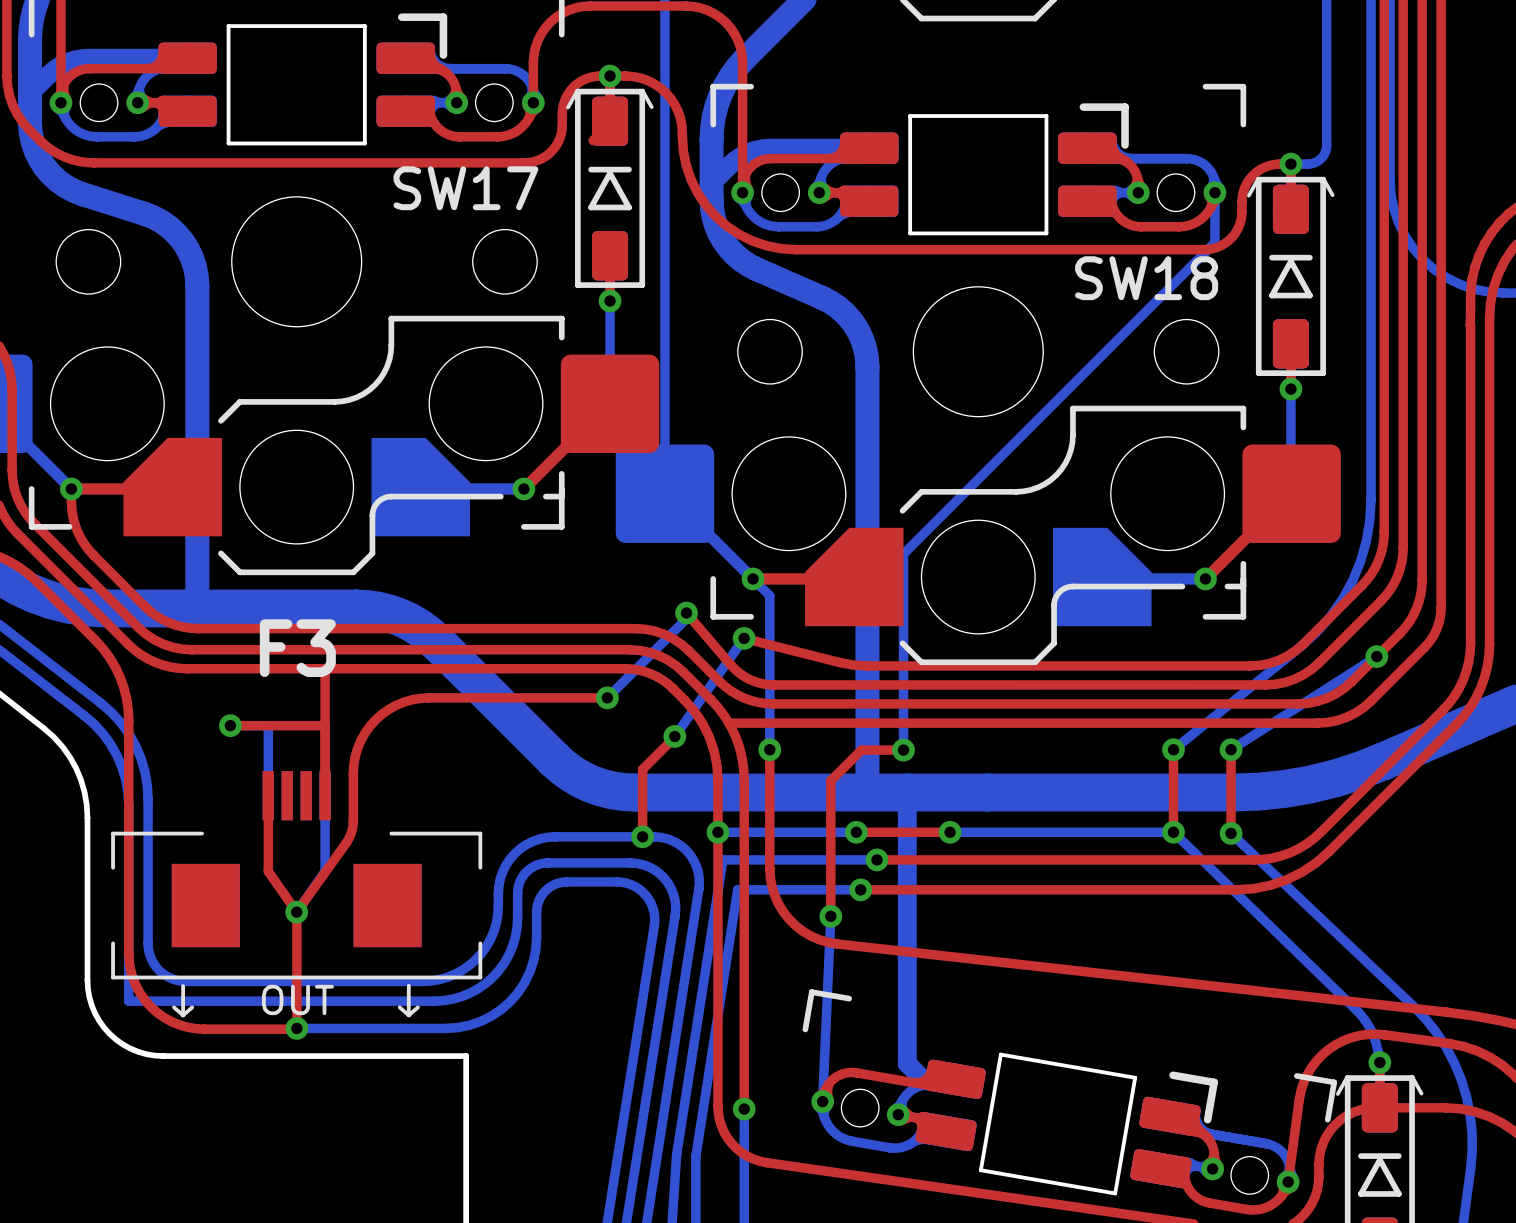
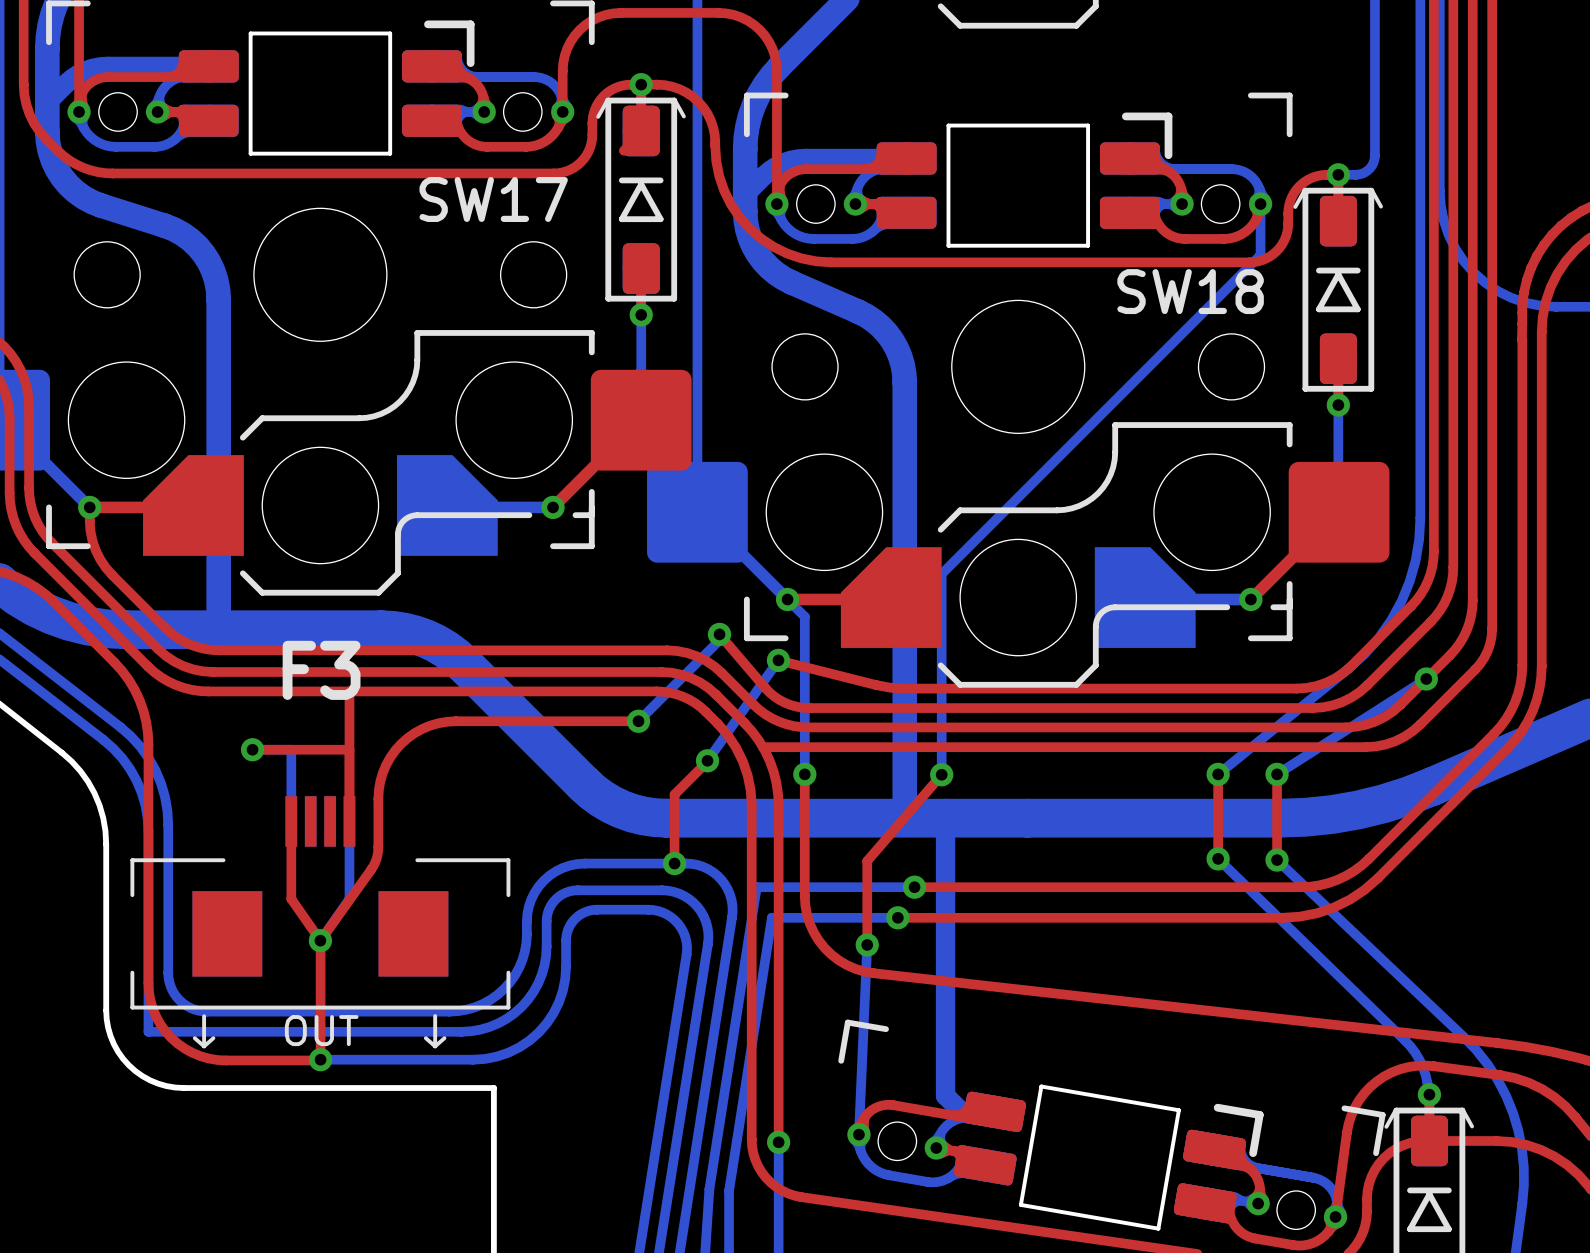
top track: (903, 750) (861, 750) (830, 780) (830, 834) -> (941, 774) (867, 861)
bottom track: (717, 832) (856, 832) -> none
via: (717, 832) -> none
top track: (856, 832) (950, 832) -> none
via: (856, 832) -> none
bottom track: (950, 832) (1173, 832) -> none
via: (950, 832) -> none

